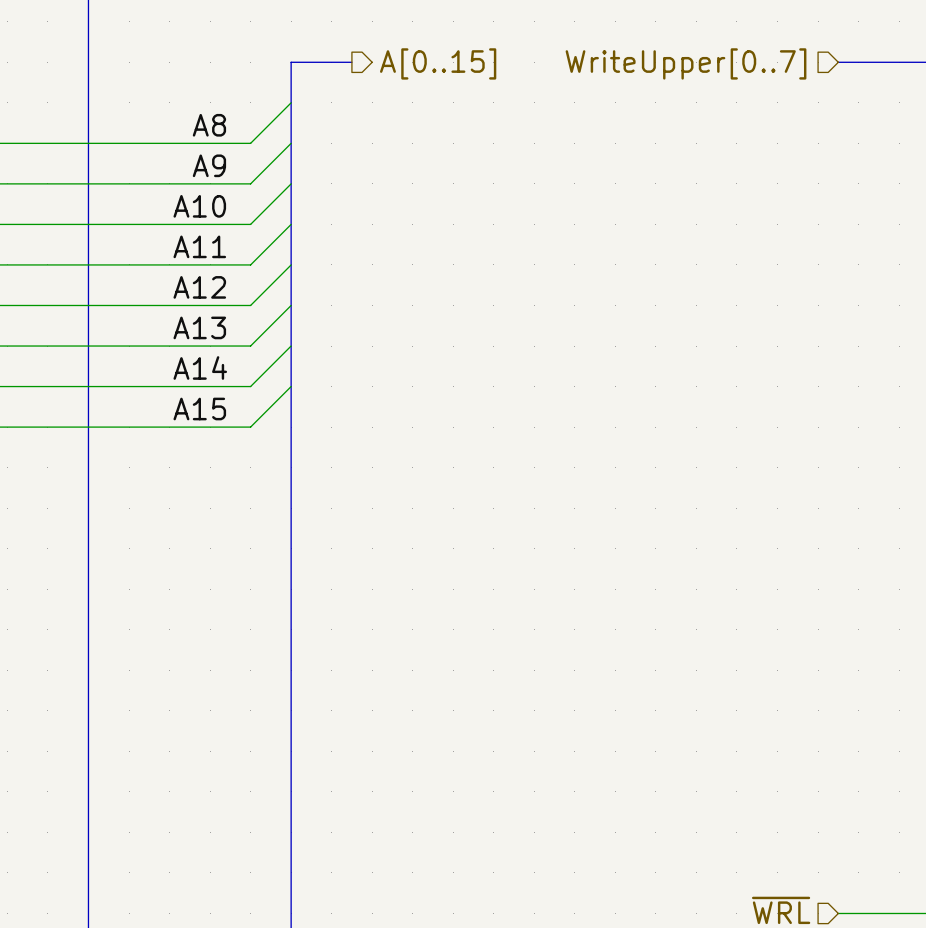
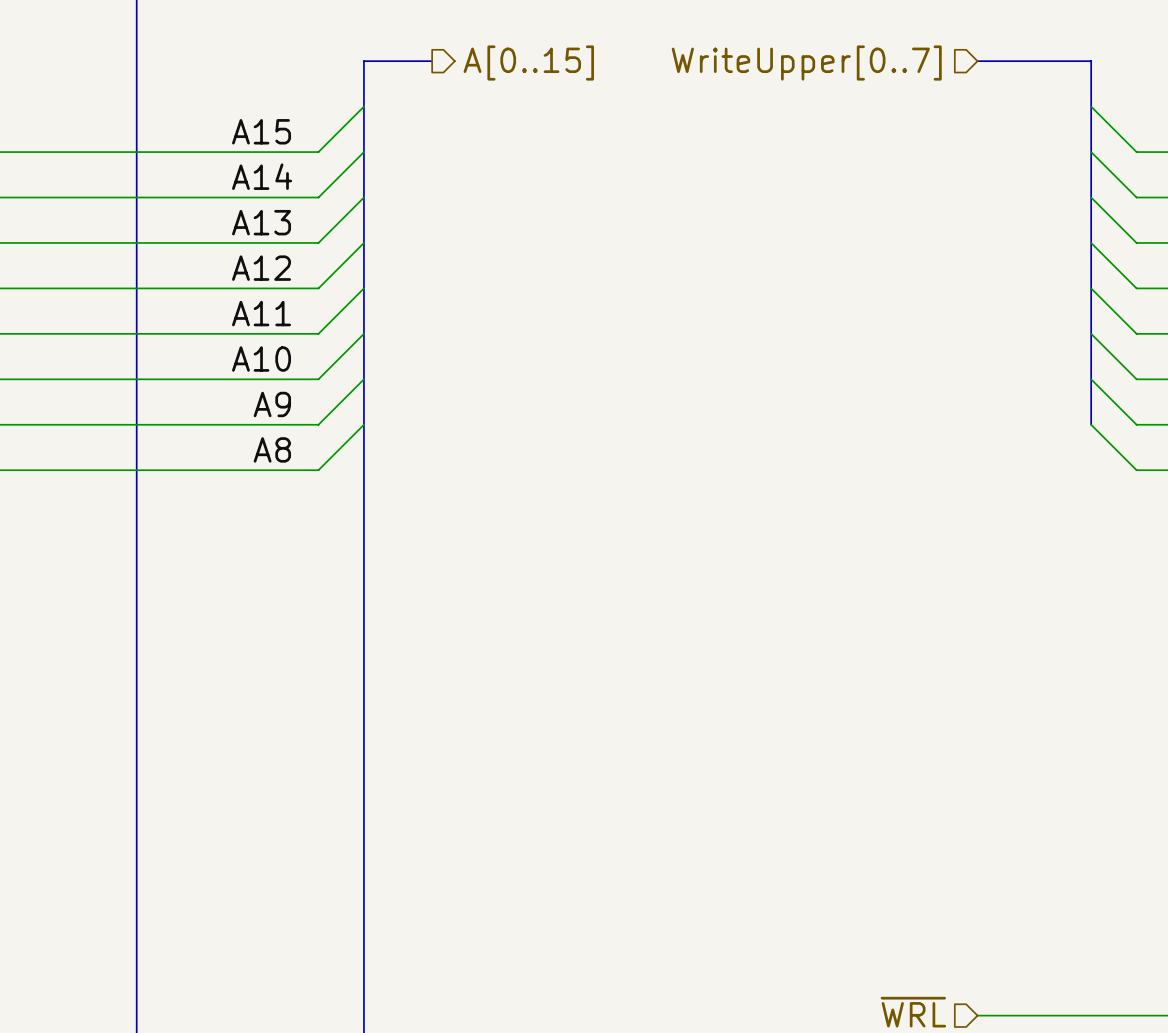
label: A8 (209, 125) -> A15 (261, 131)
label: A9 (209, 165) -> A14 (262, 176)
label: A10 (199, 206) -> A13 (261, 222)
label: A11 (199, 246) -> A12 (261, 268)
label: A12 (199, 287) -> A11 (261, 313)
label: A13 (199, 327) -> A10 (261, 359)
label: A14 (200, 367) -> A9 (272, 404)
label: A15 (199, 409) -> A8 (272, 449)

